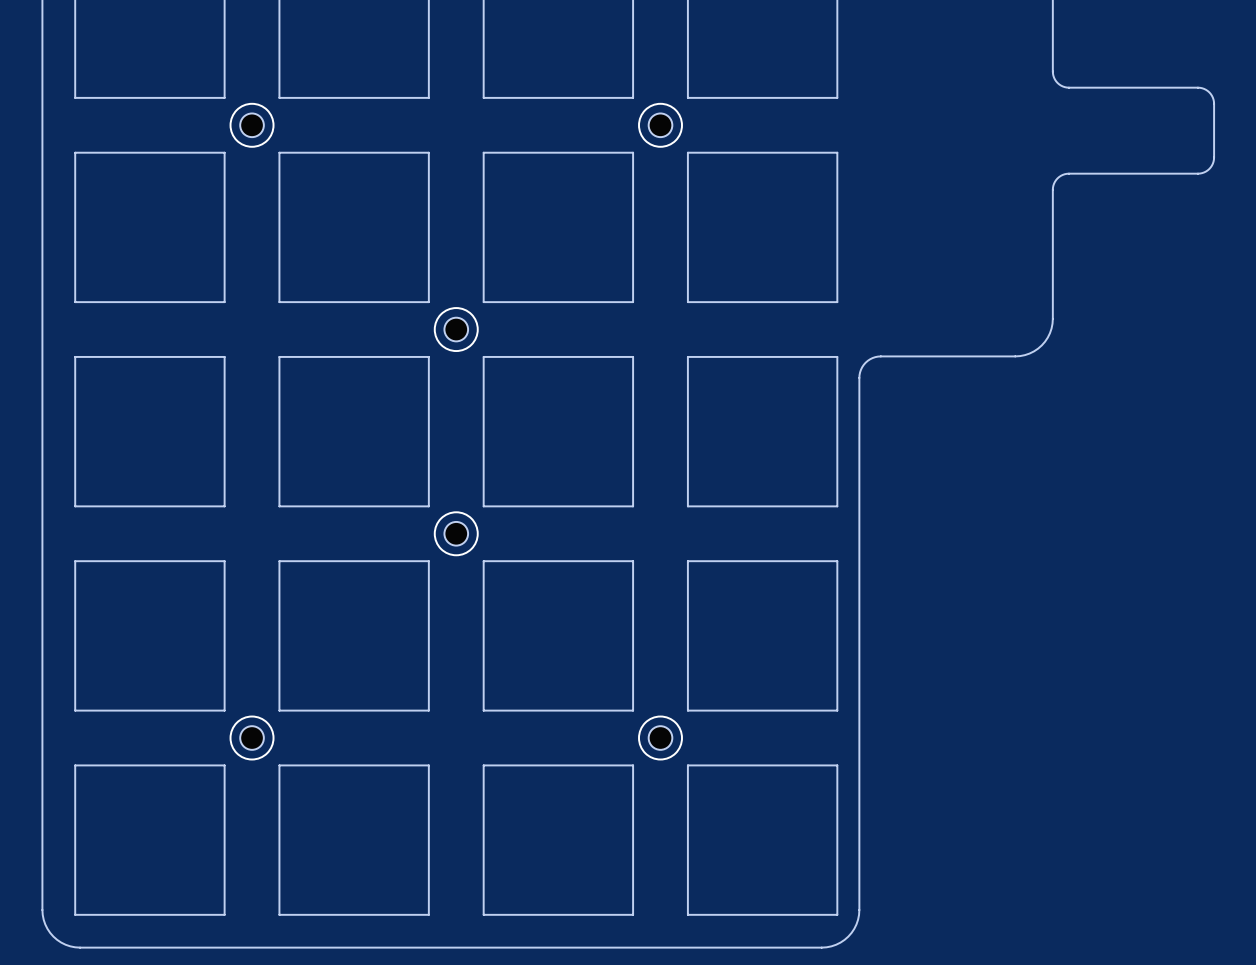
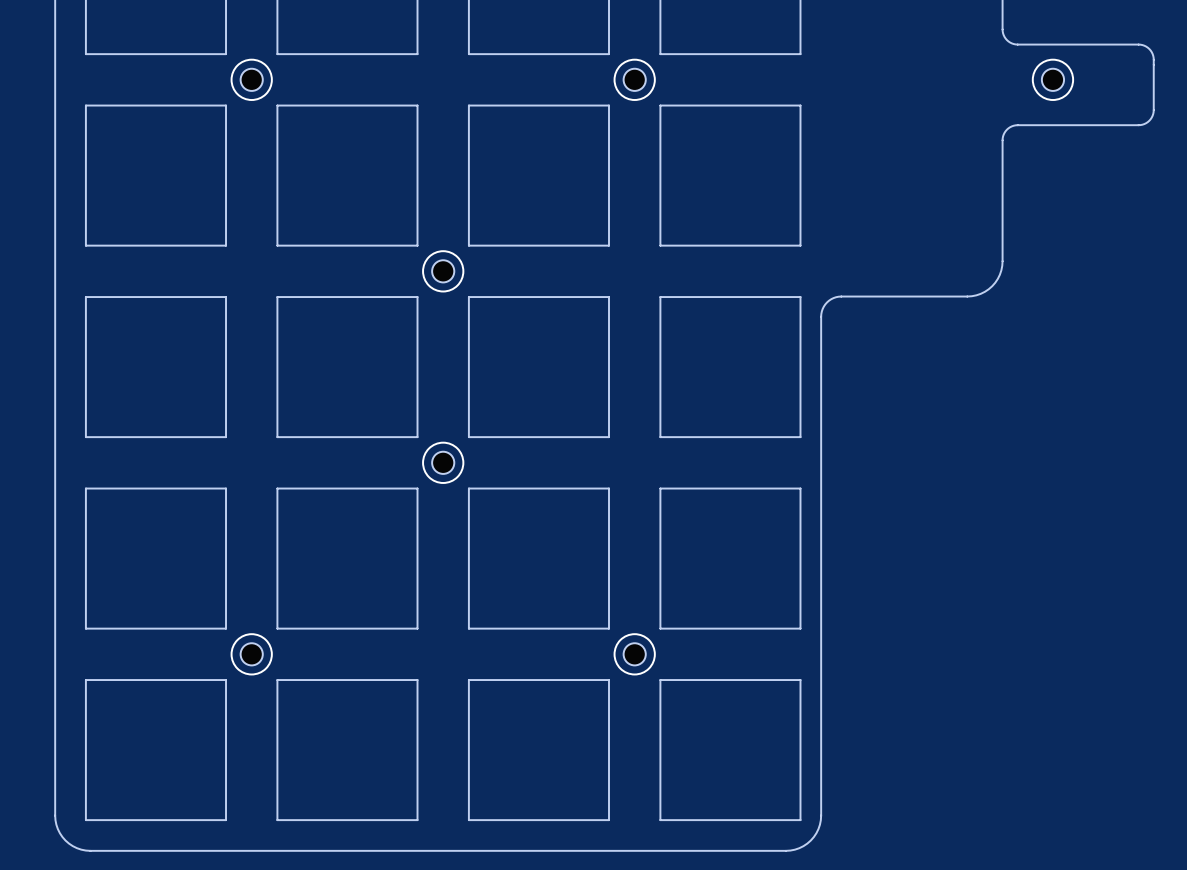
part: none -> (1052, 79)

